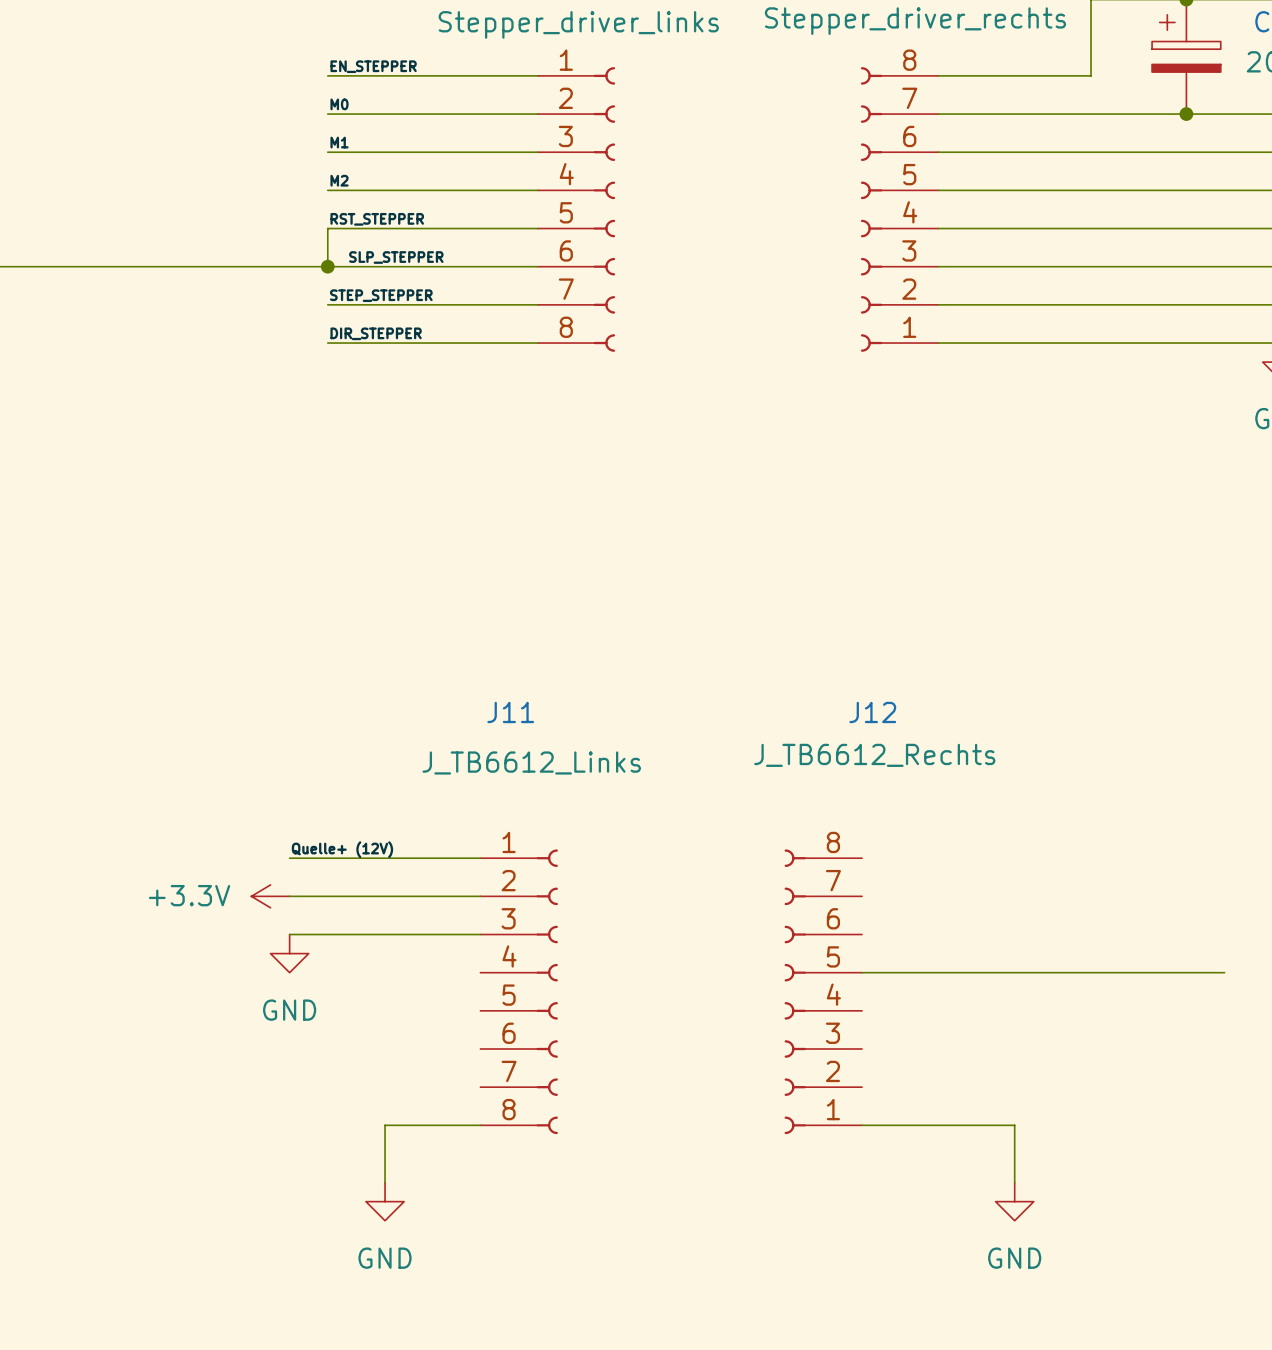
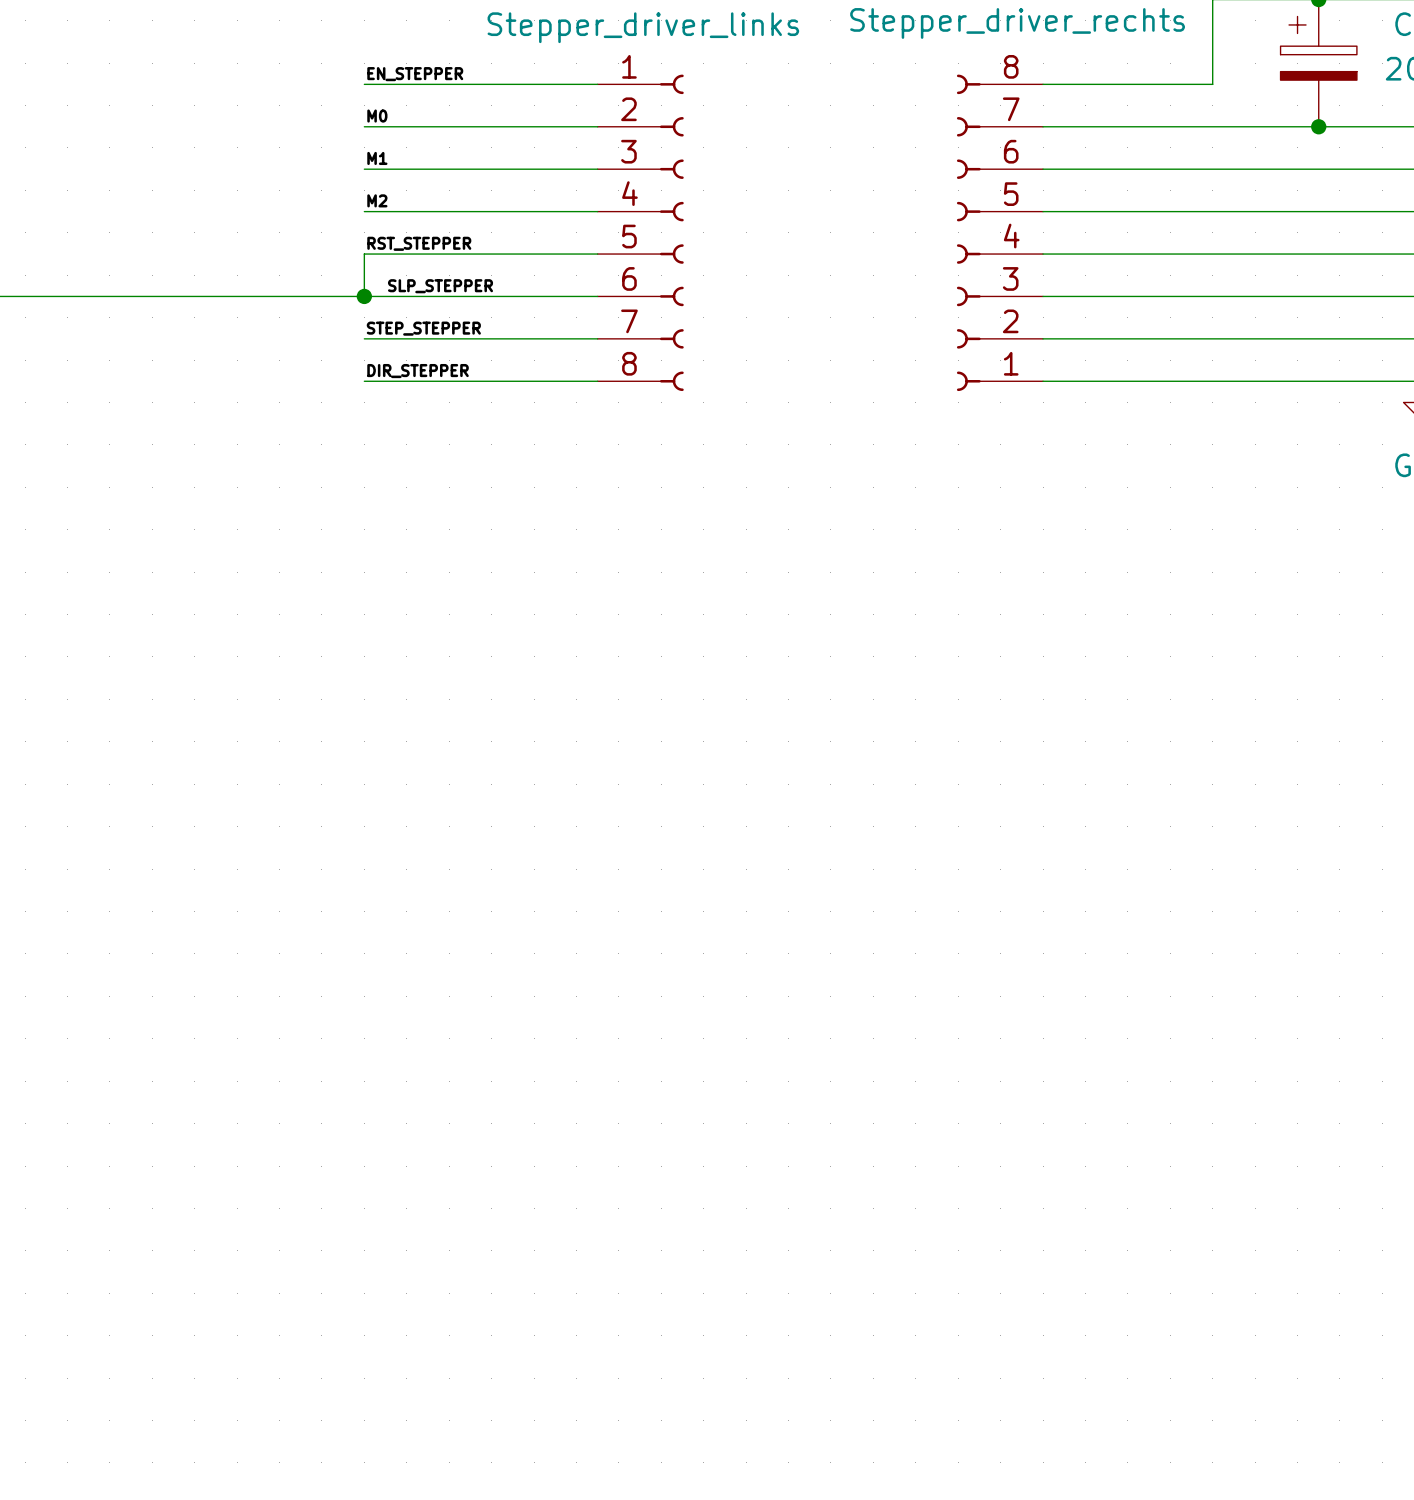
label: Quelle+ (12V) (342, 849) -> none
wire: (289, 858) (480, 858) -> none
power symbol: +3.3V (270, 896) -> none
wire: (289, 896) (480, 896) -> none
wire: (289, 934) (480, 934) -> none
power symbol: GND (289, 953) -> none
wire: (862, 972) (1224, 972) -> none
J11: J_TB6612_Links (519, 991) -> none
J12: J_TB6612_Rechts (823, 991) -> none
wire: (480, 1125) (385, 1125) (385, 1182) -> none
wire: (862, 1125) (1014, 1125) (1014, 1182) -> none
power symbol: GND (385, 1201) -> none
power symbol: GND (1014, 1201) -> none

